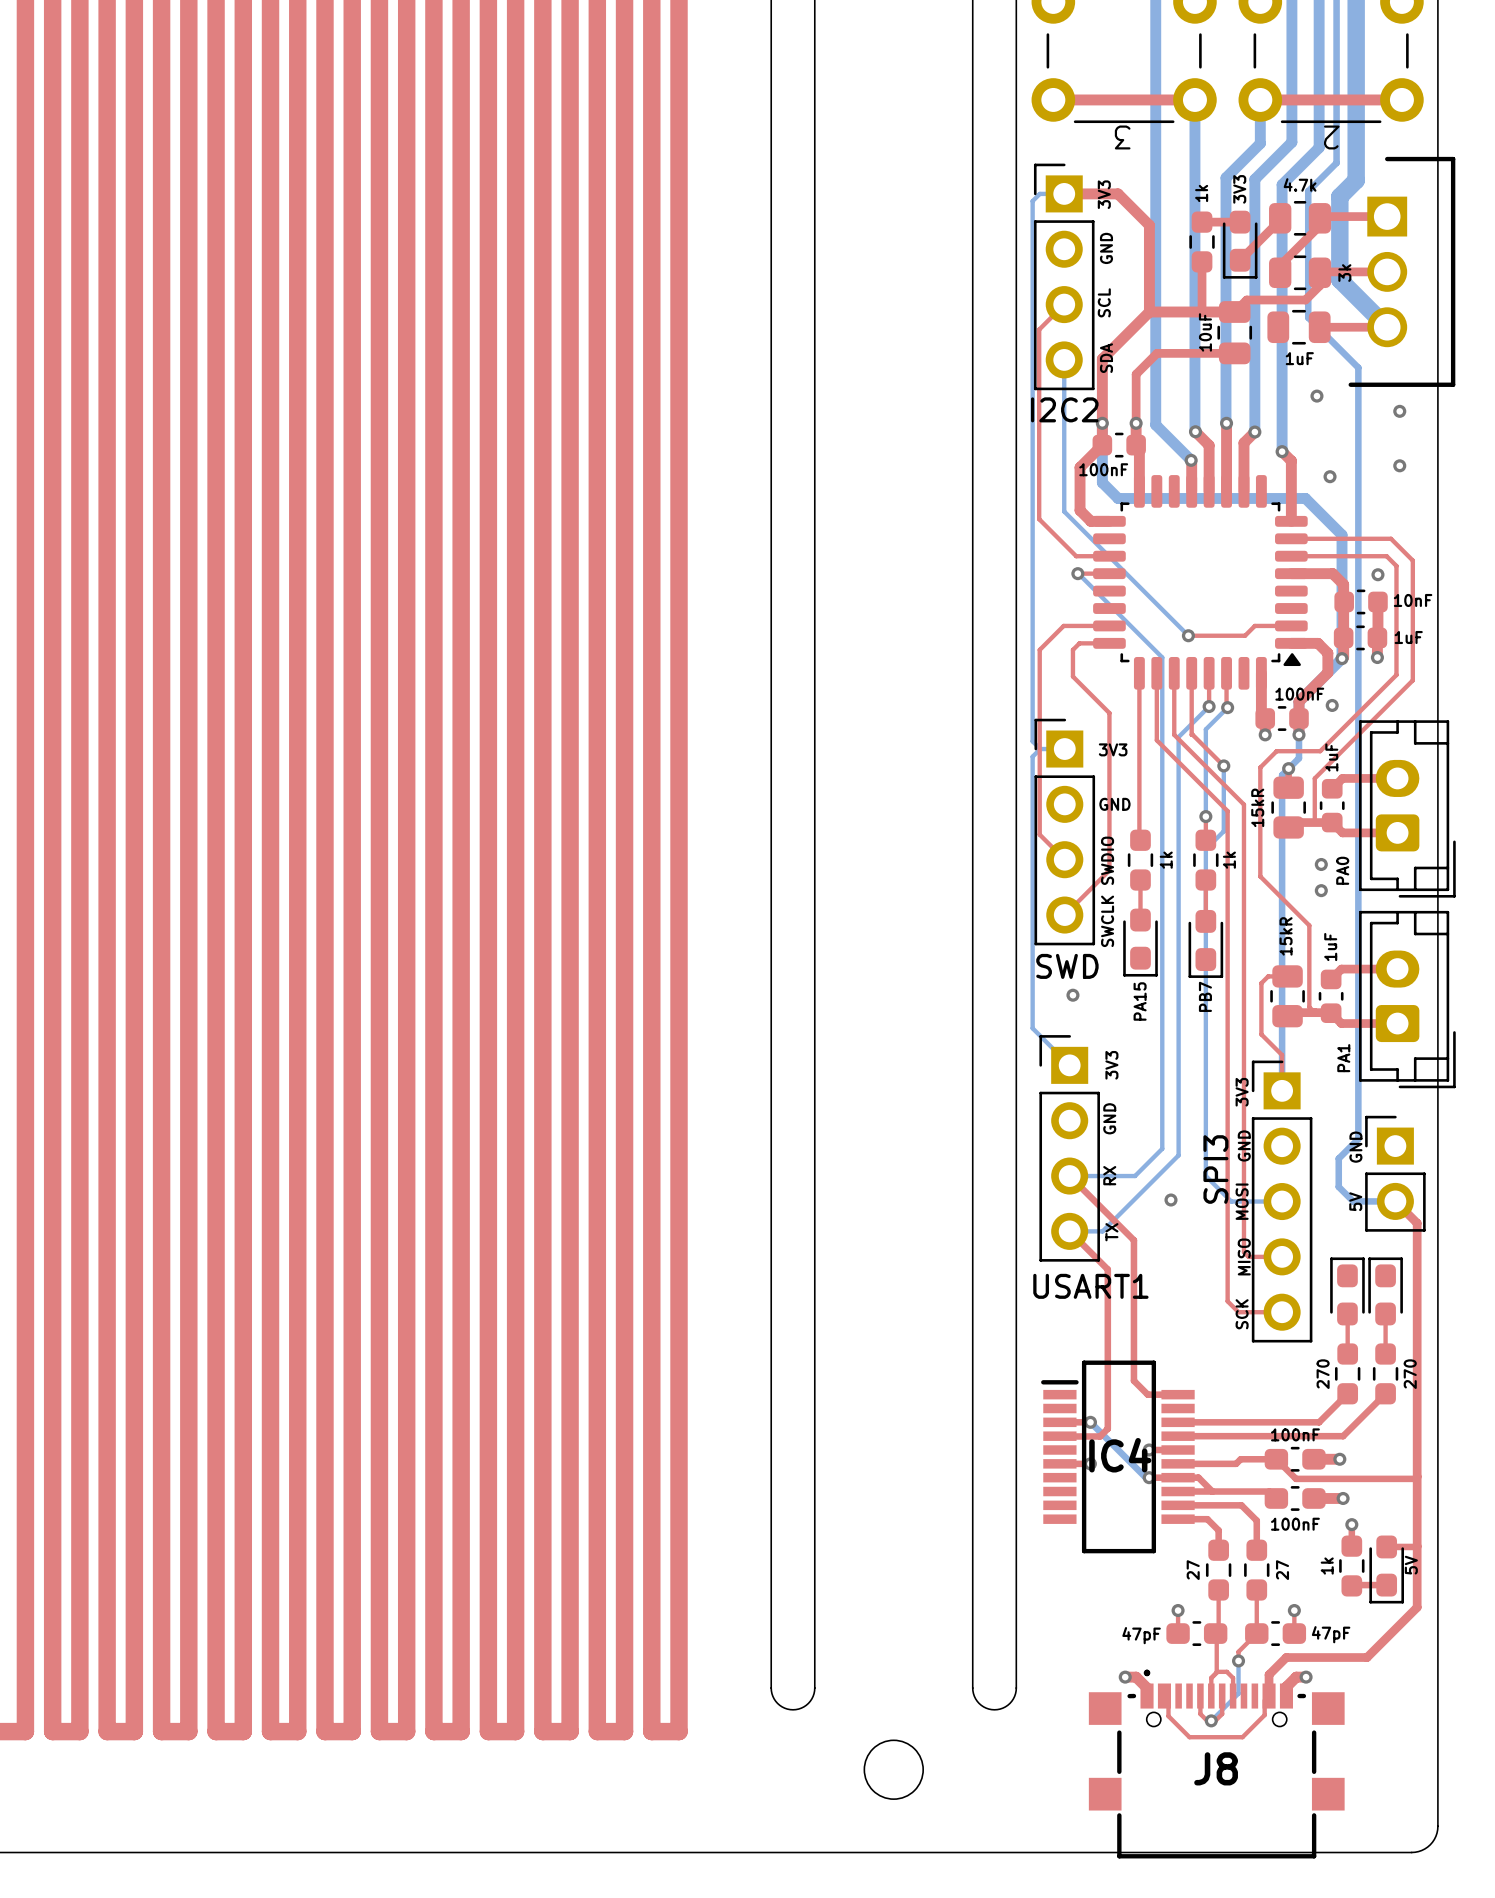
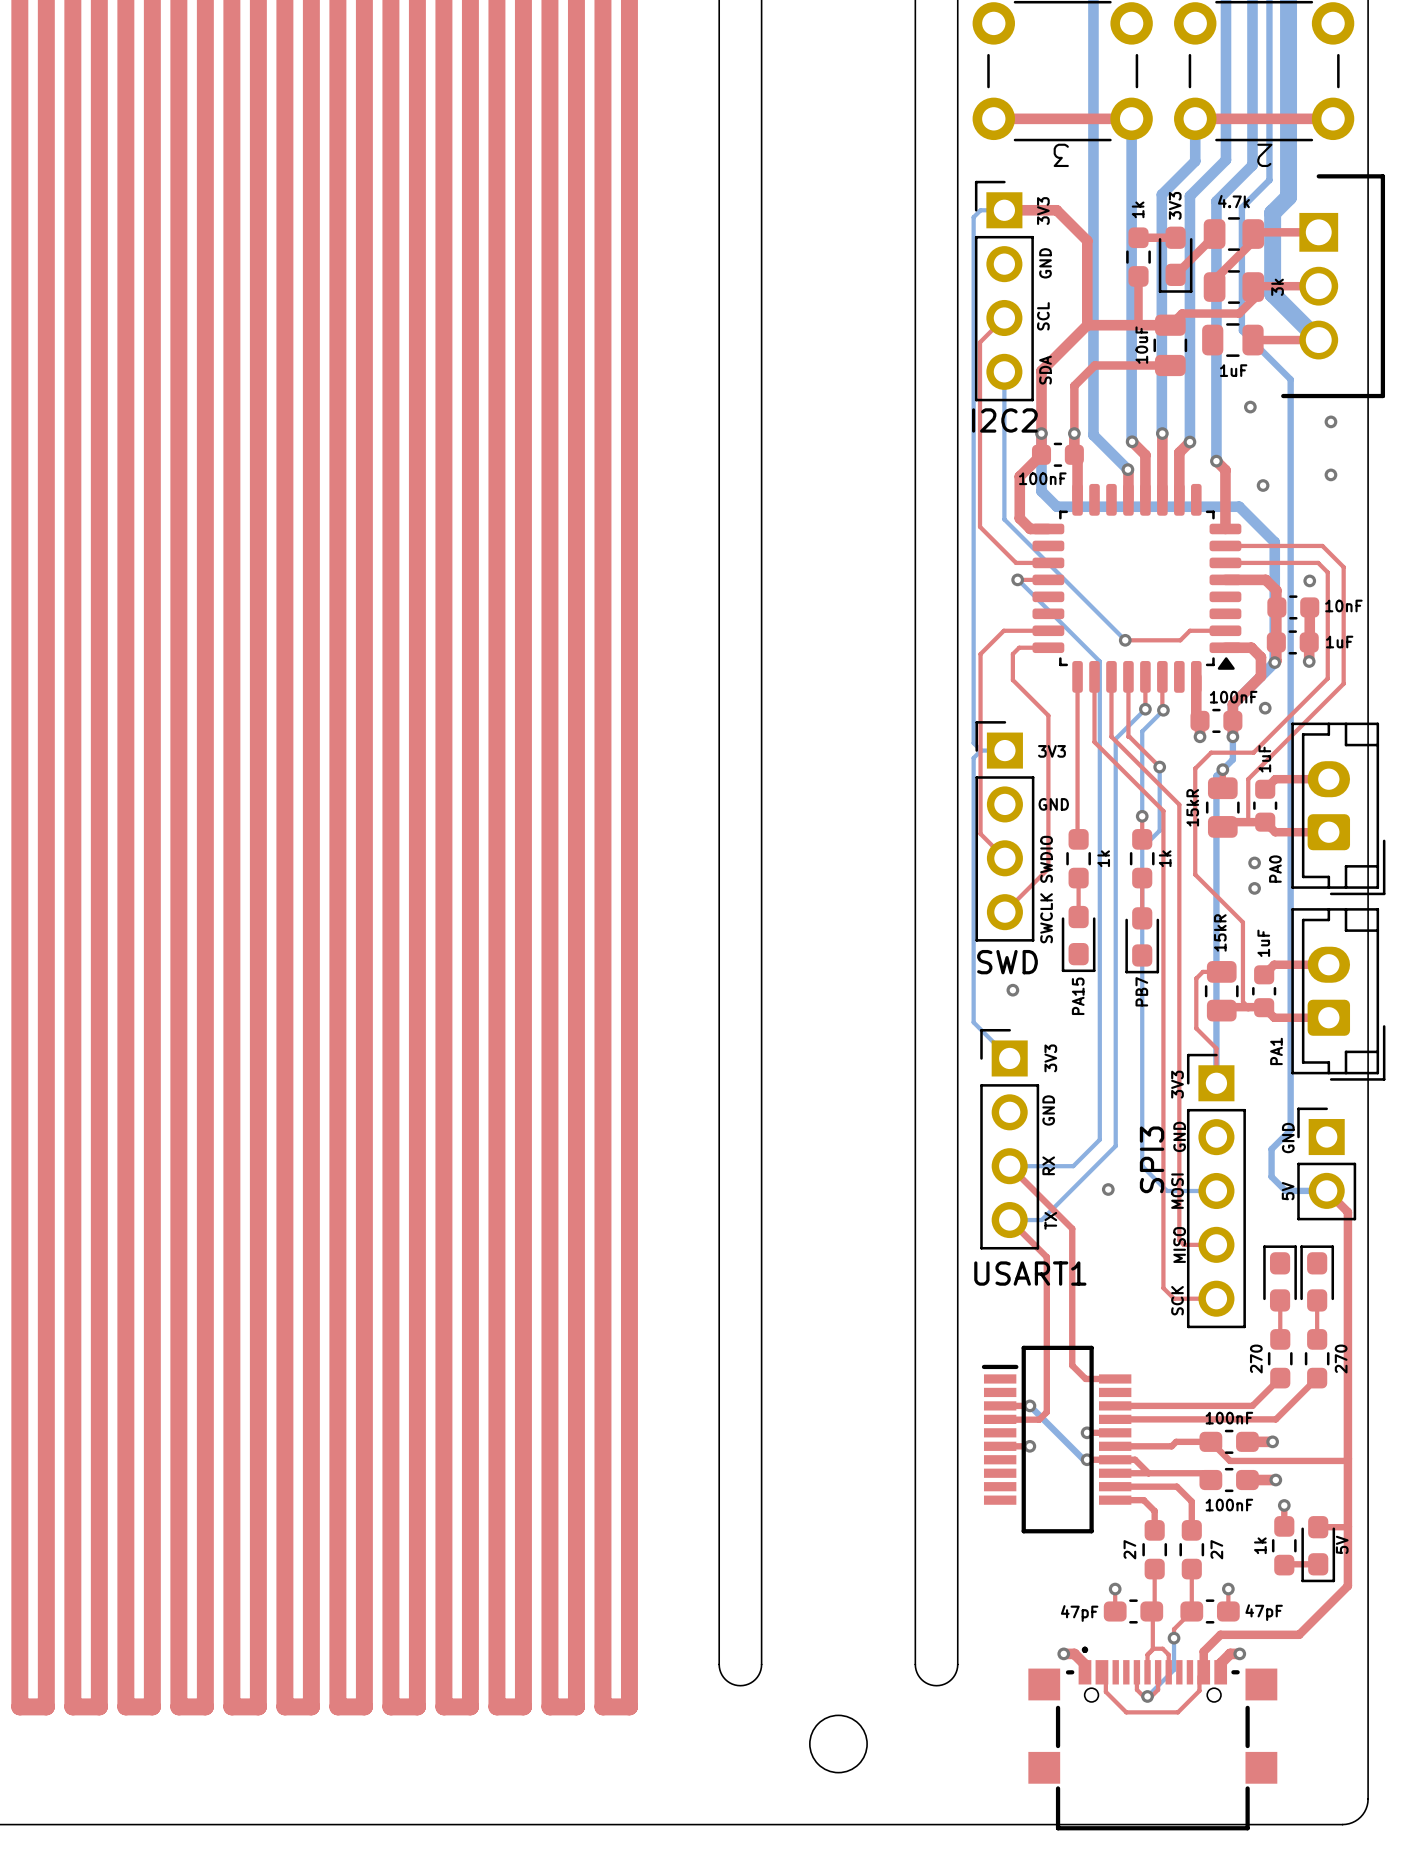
IC4 name: IC4 (1120, 1455) -> none
J8 name: J8 (1216, 1768) -> none

